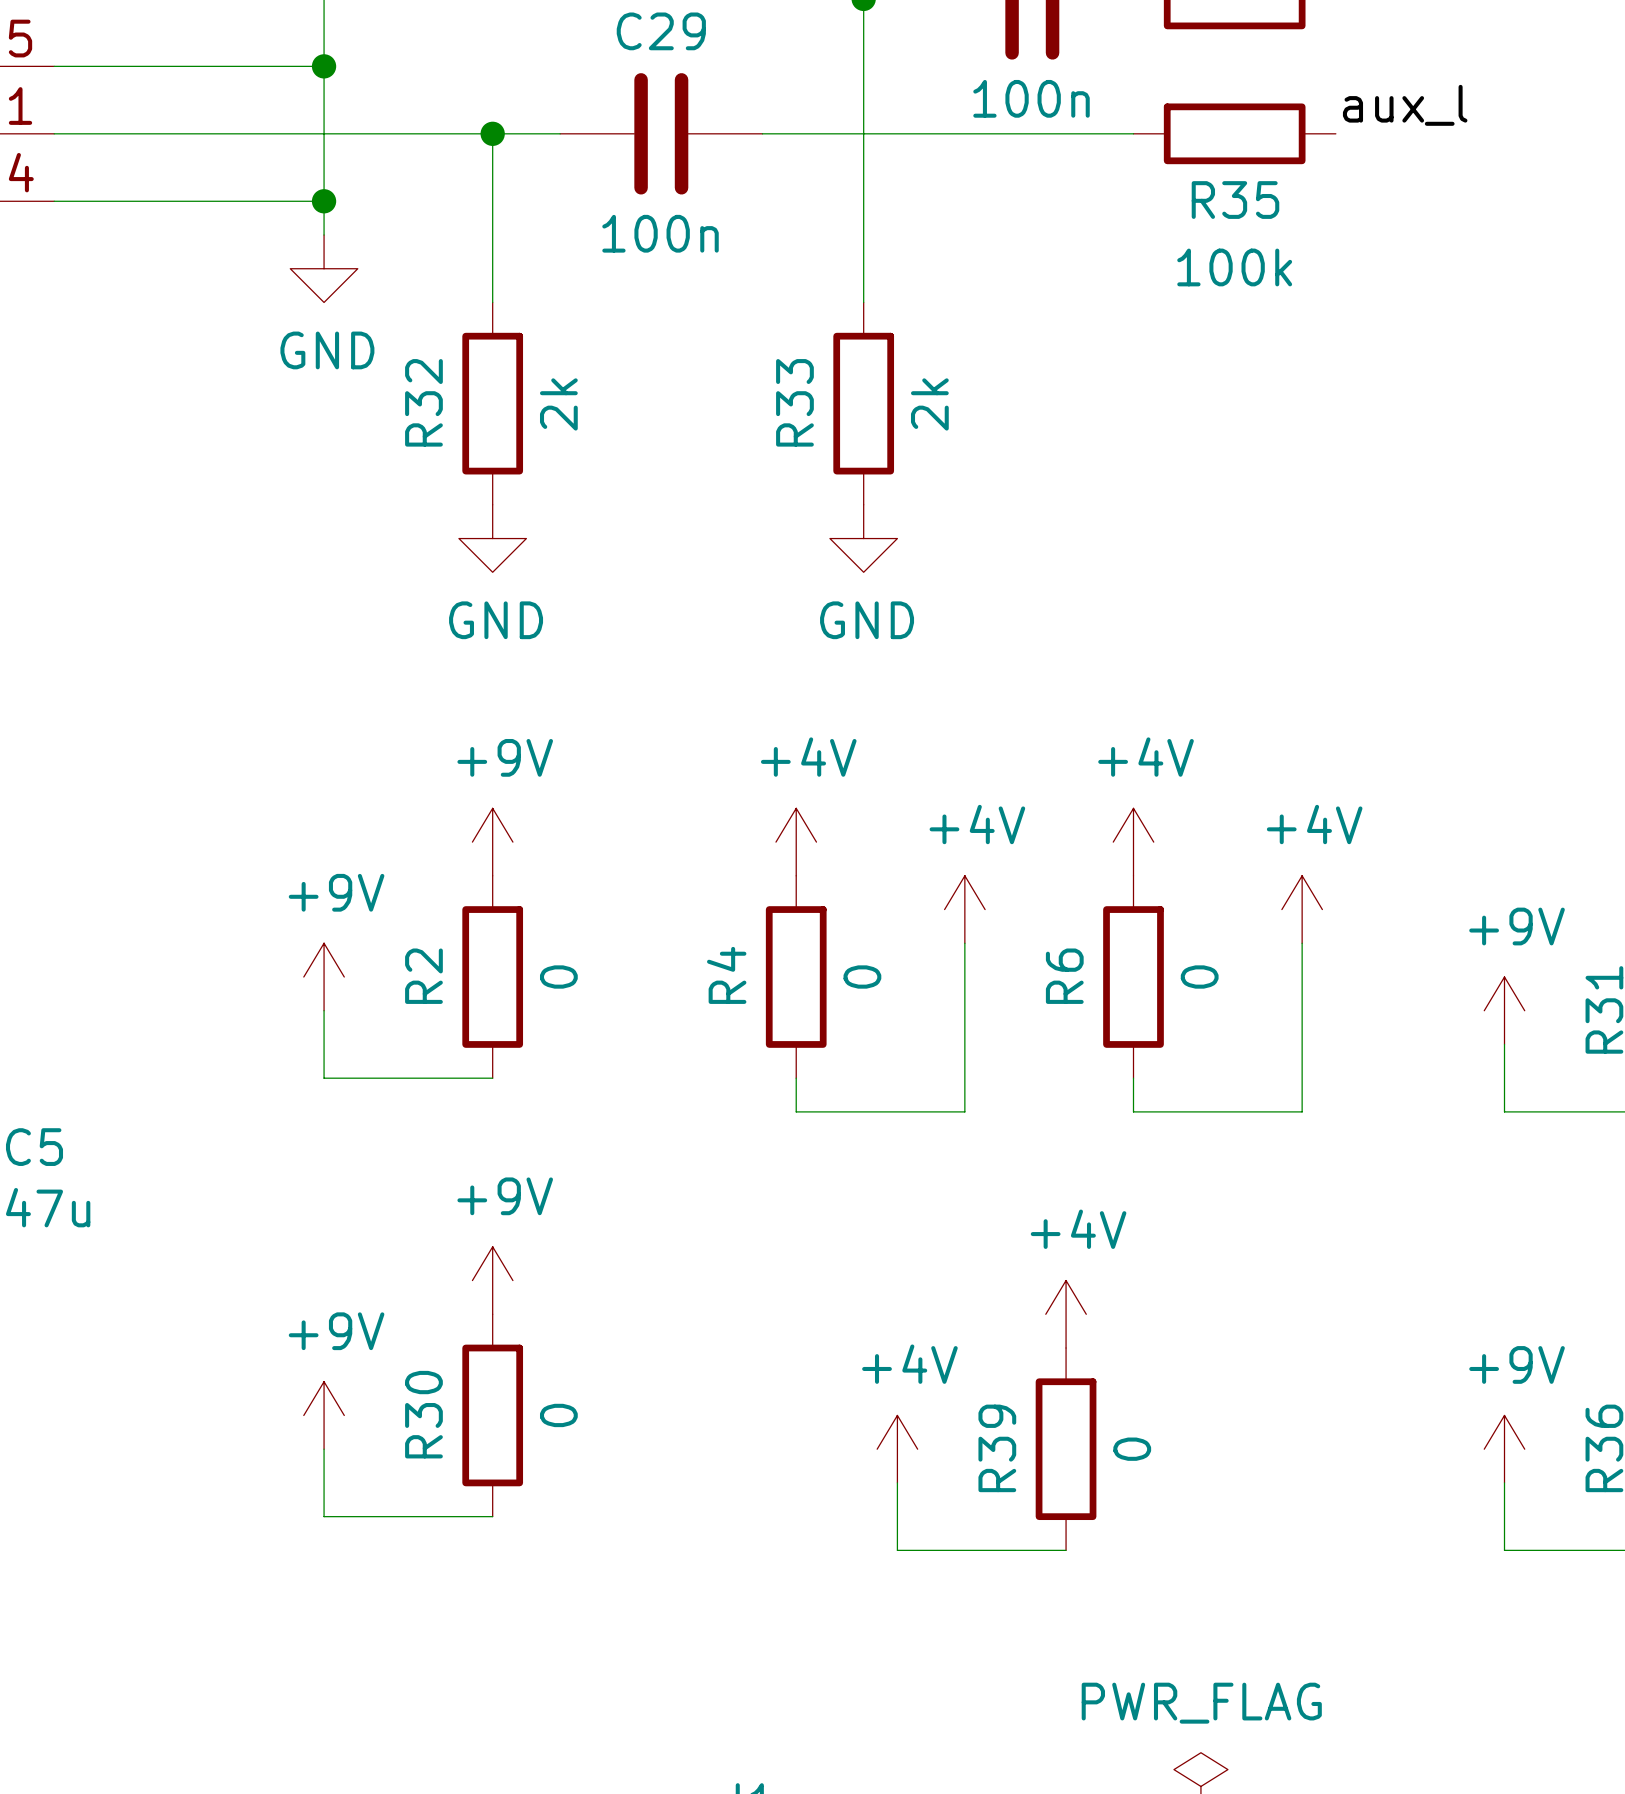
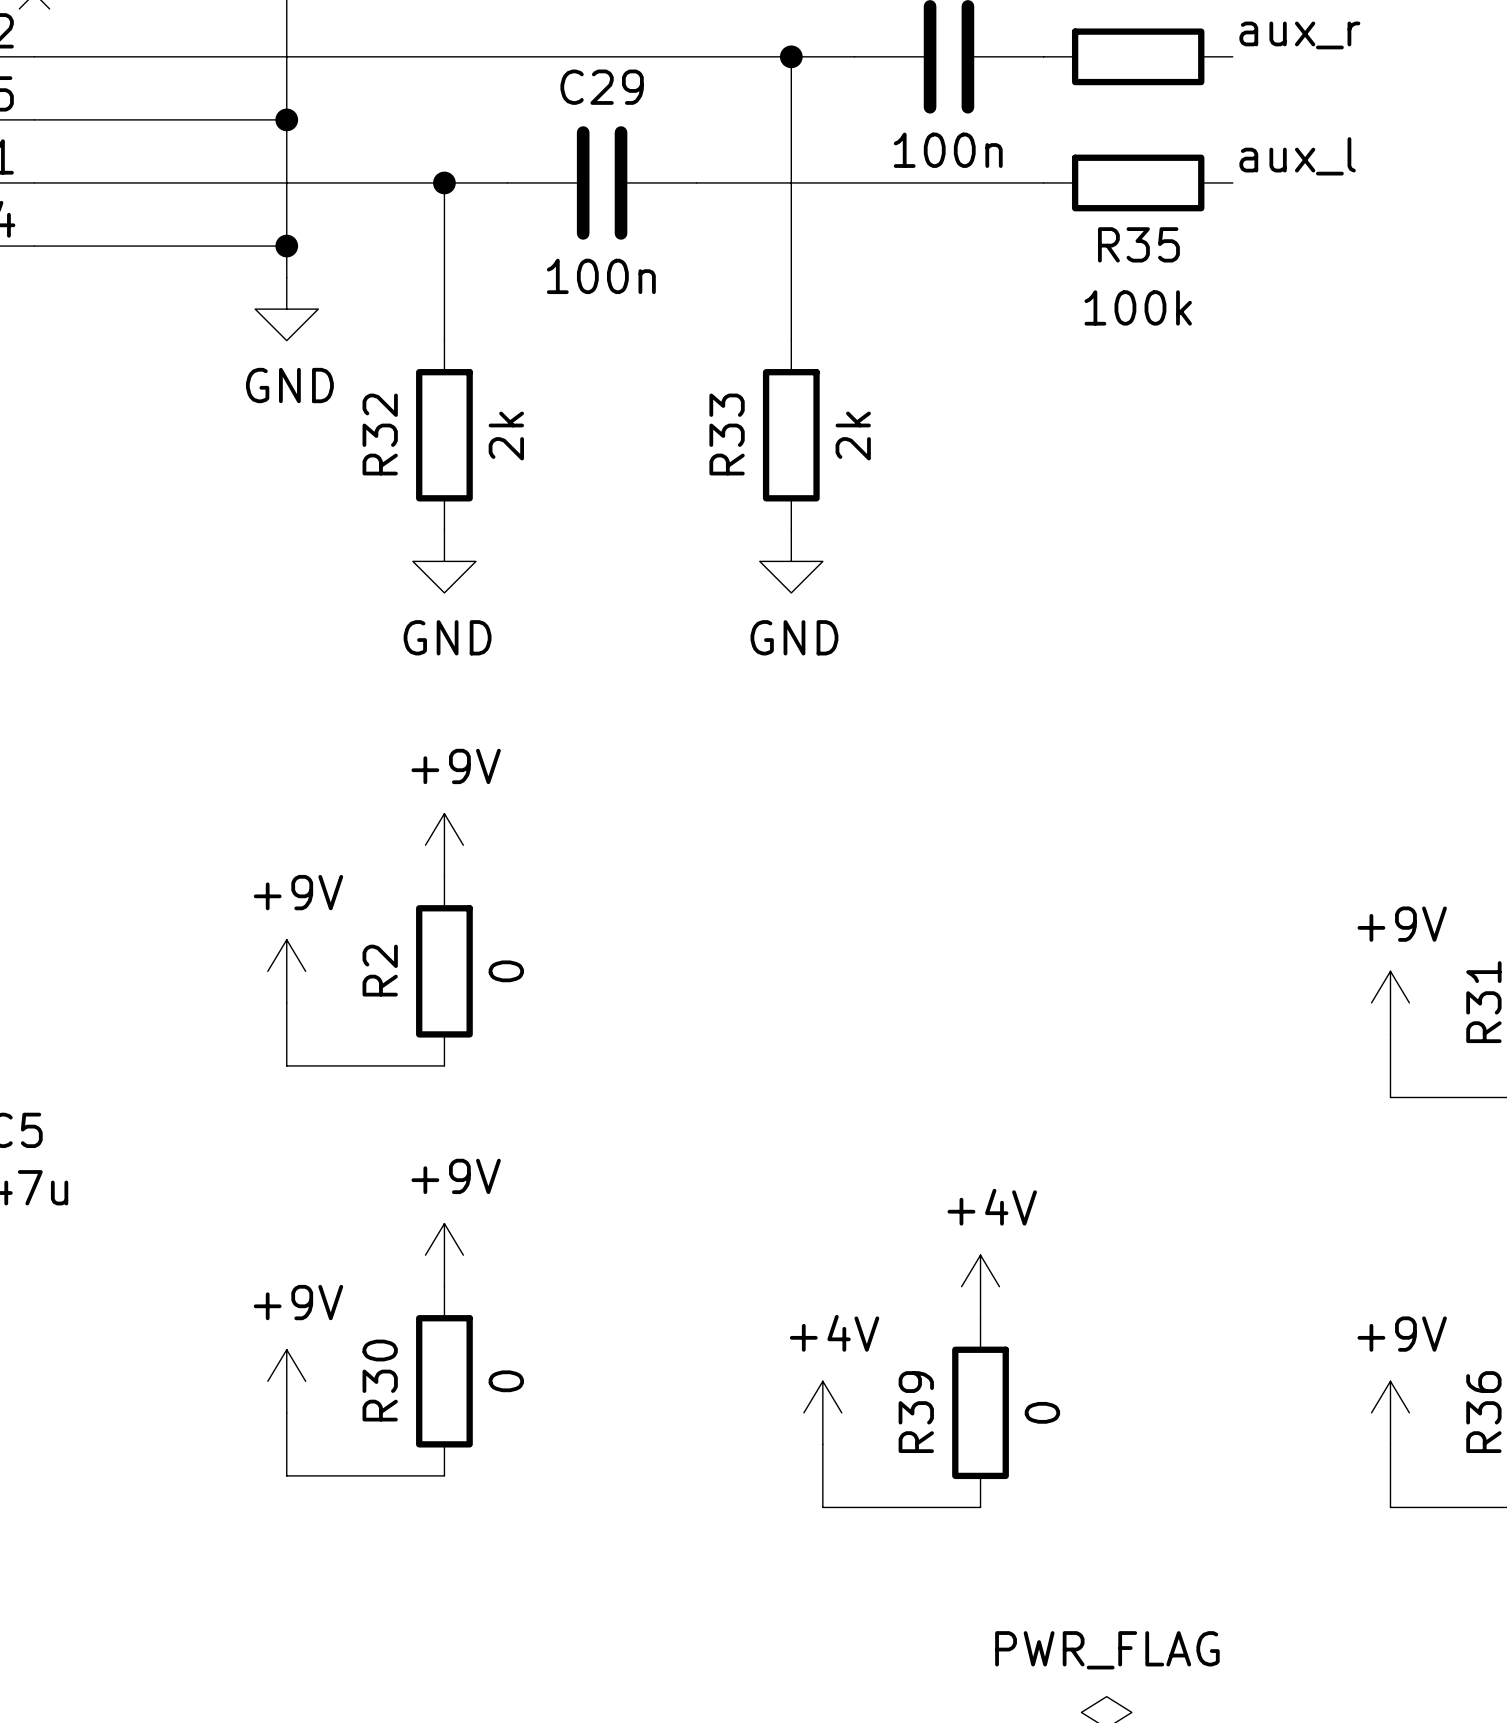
power symbol: +4V (796, 842) -> none
power symbol: +4V (1133, 842) -> none
power symbol: +4V (964, 909) -> none
power symbol: +4V (1302, 909) -> none
wire: (964, 943) (964, 1111) (796, 1111) (796, 1078) -> none
wire: (1302, 943) (1302, 1111) (1133, 1111) (1133, 1078) -> none
R4: 0 (796, 977) -> none
R6: 0 (1133, 977) -> none

